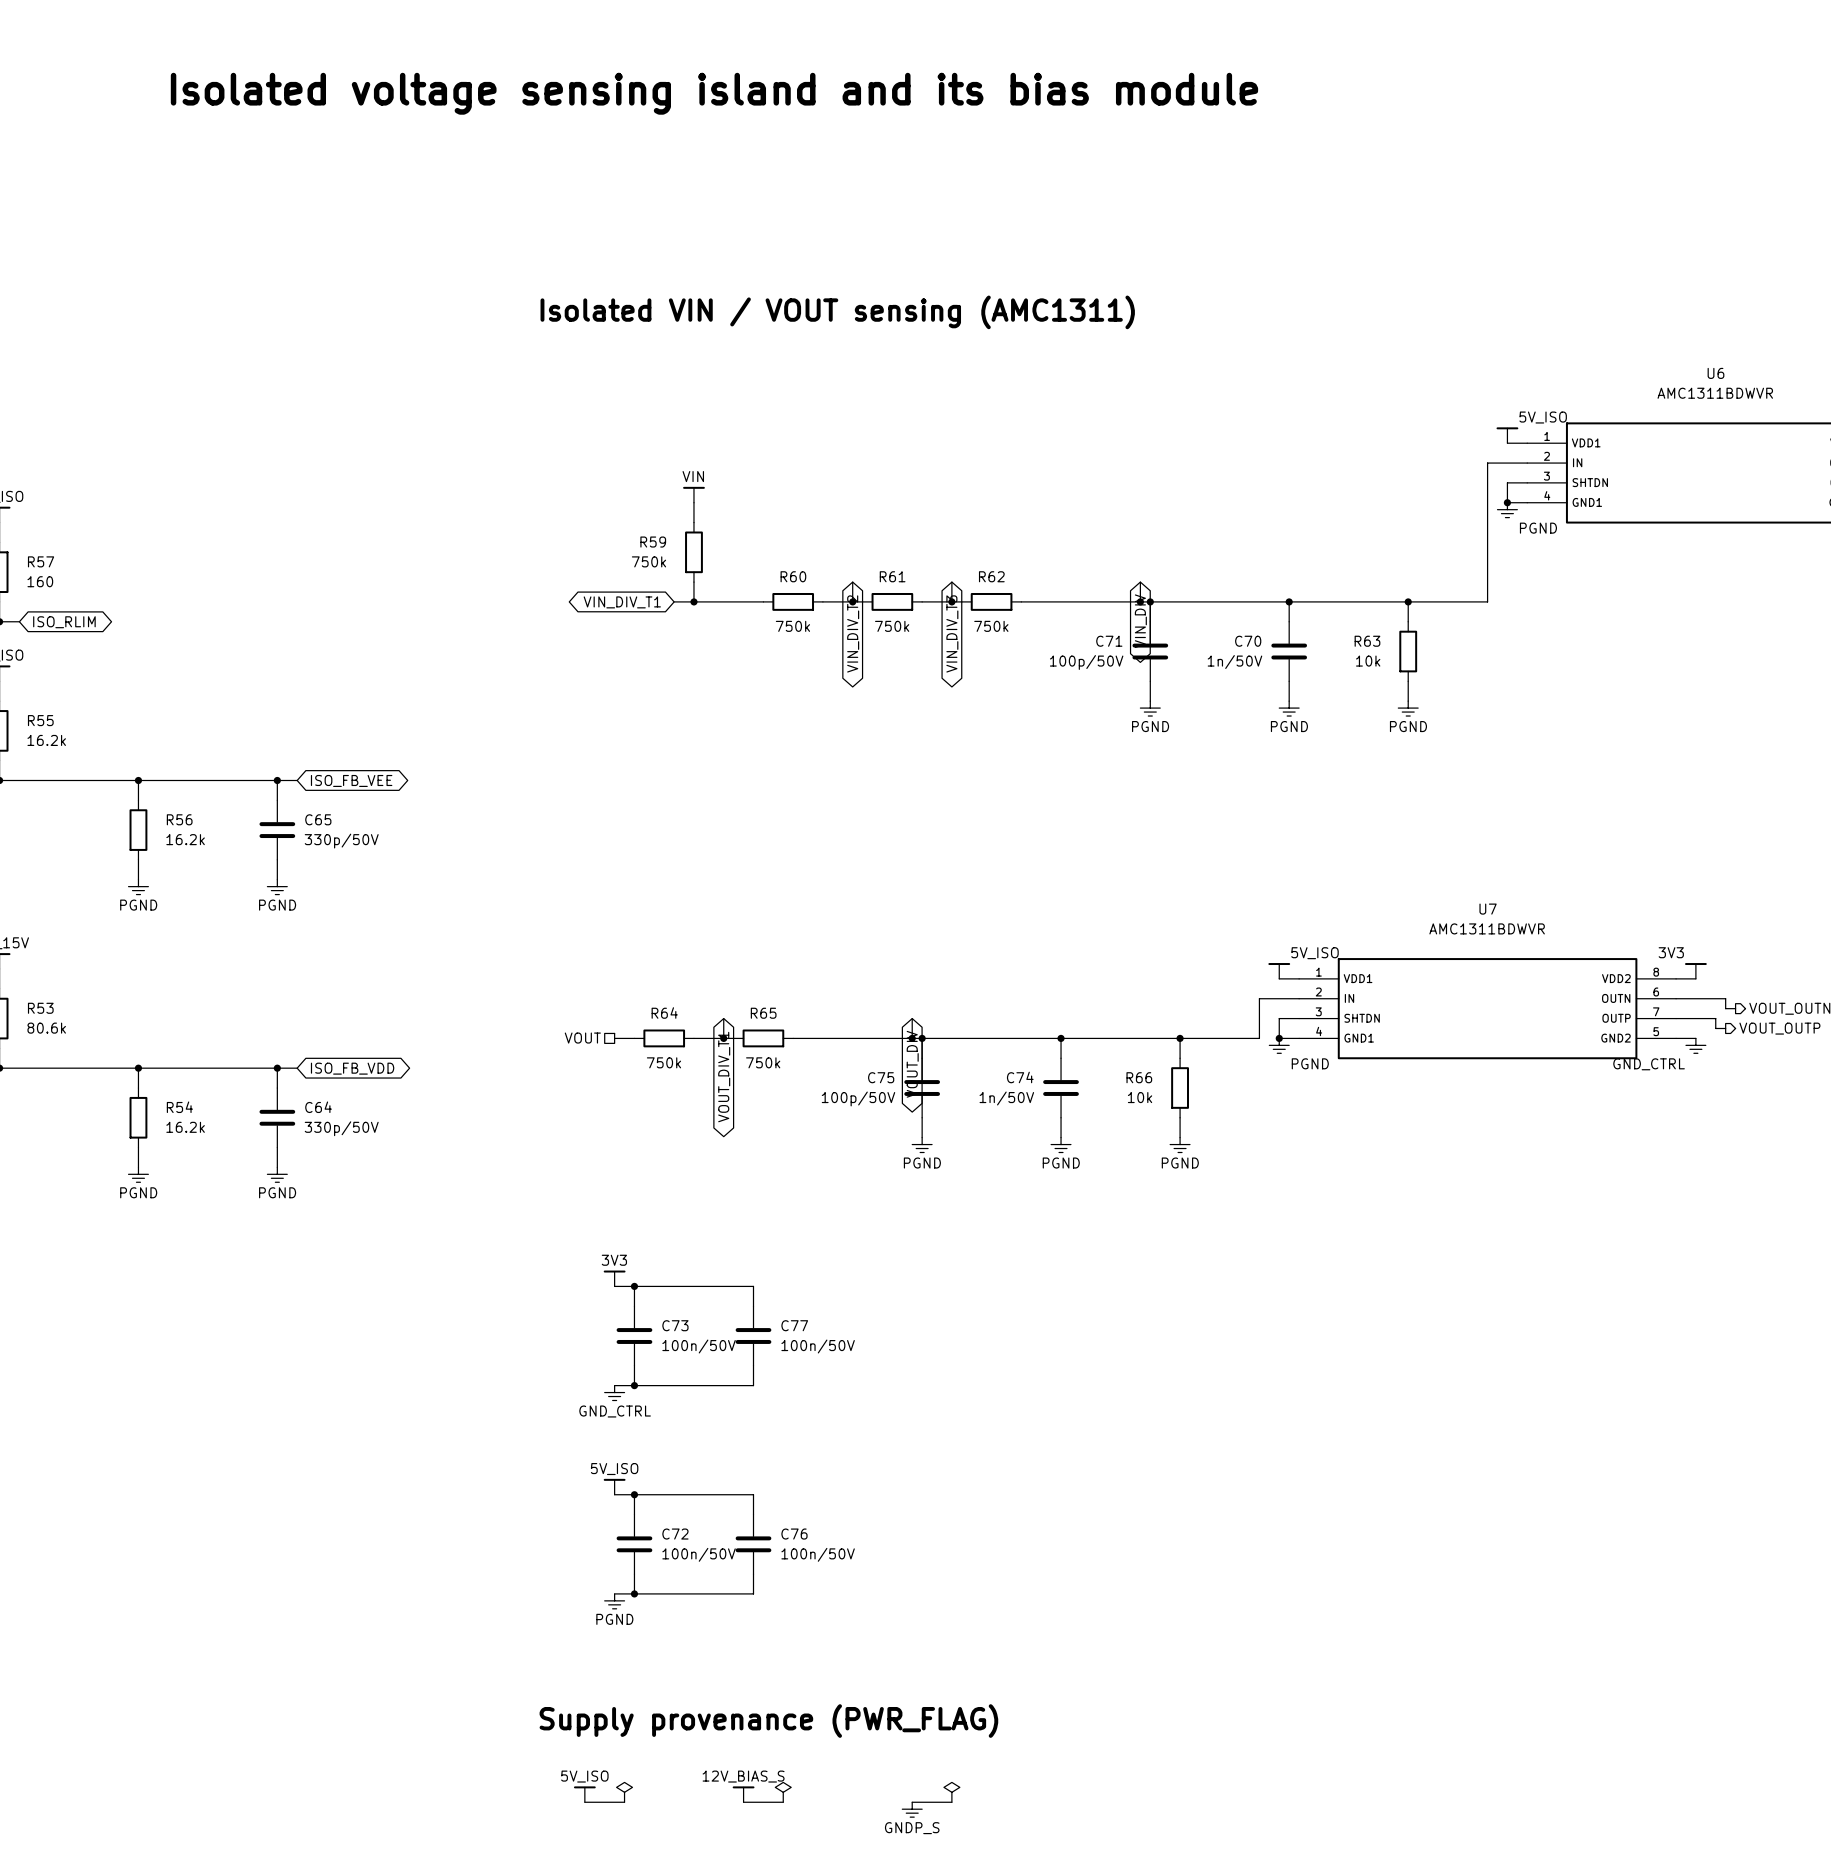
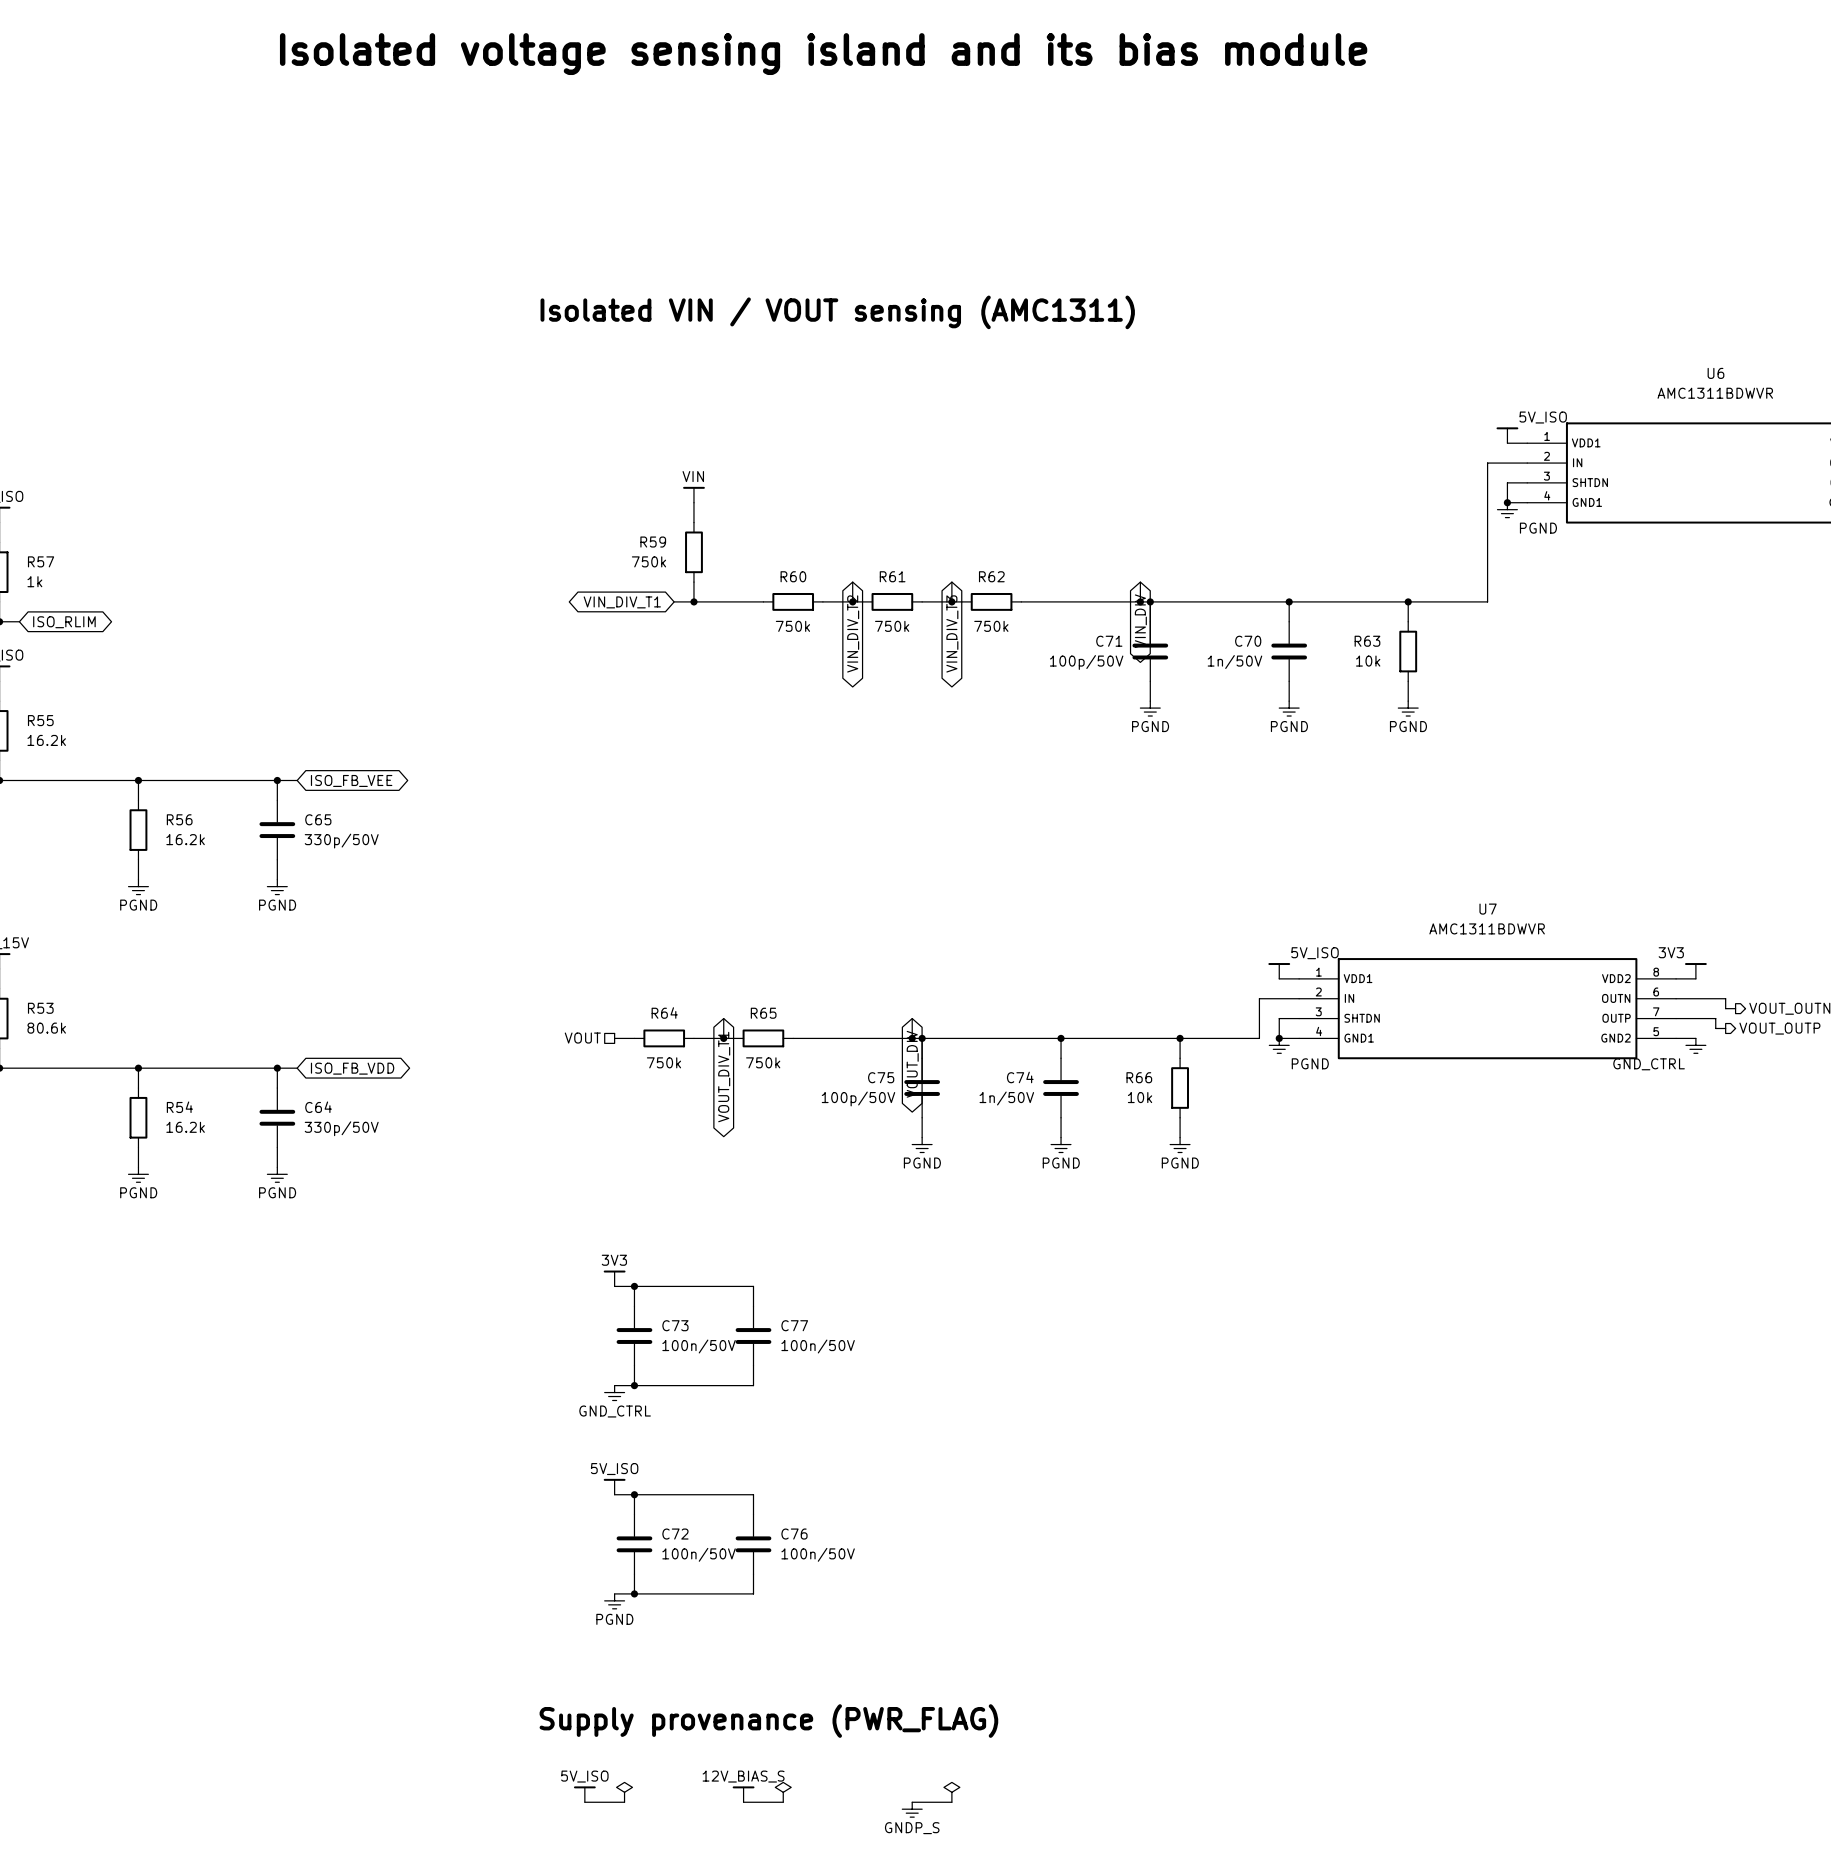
text position: Isolated voltage sensing island and its bias module (714, 93) -> Isolated voltage sensing island and its bias module (823, 54)
R57 value: 160 (40, 581) -> 1k (34, 581)

